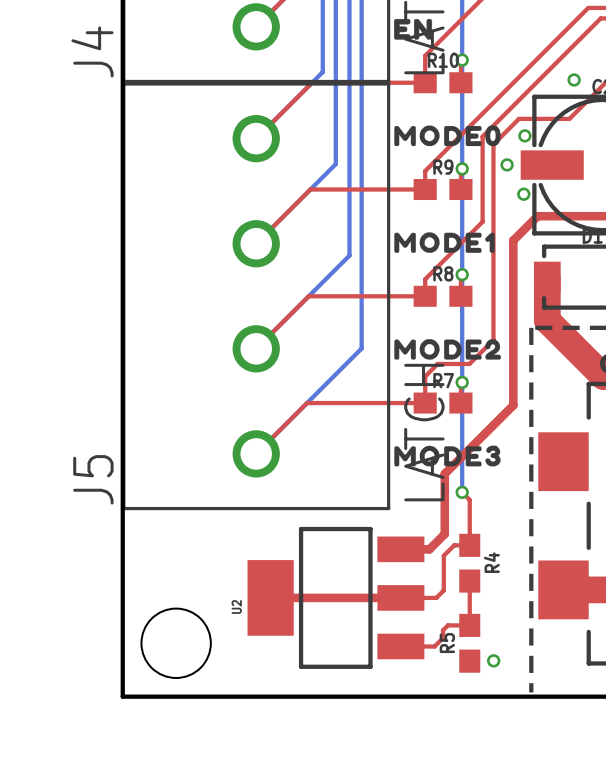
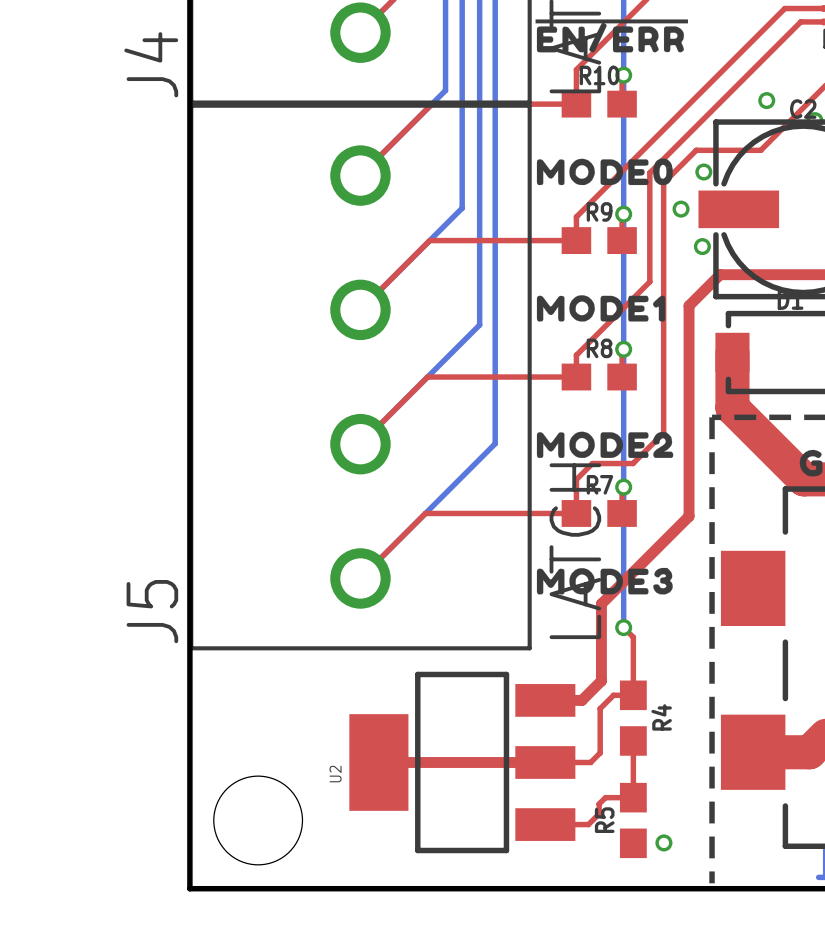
drawing: none -> [535, 19, 689, 53]
drawing: [394, 18, 433, 40] -> none

